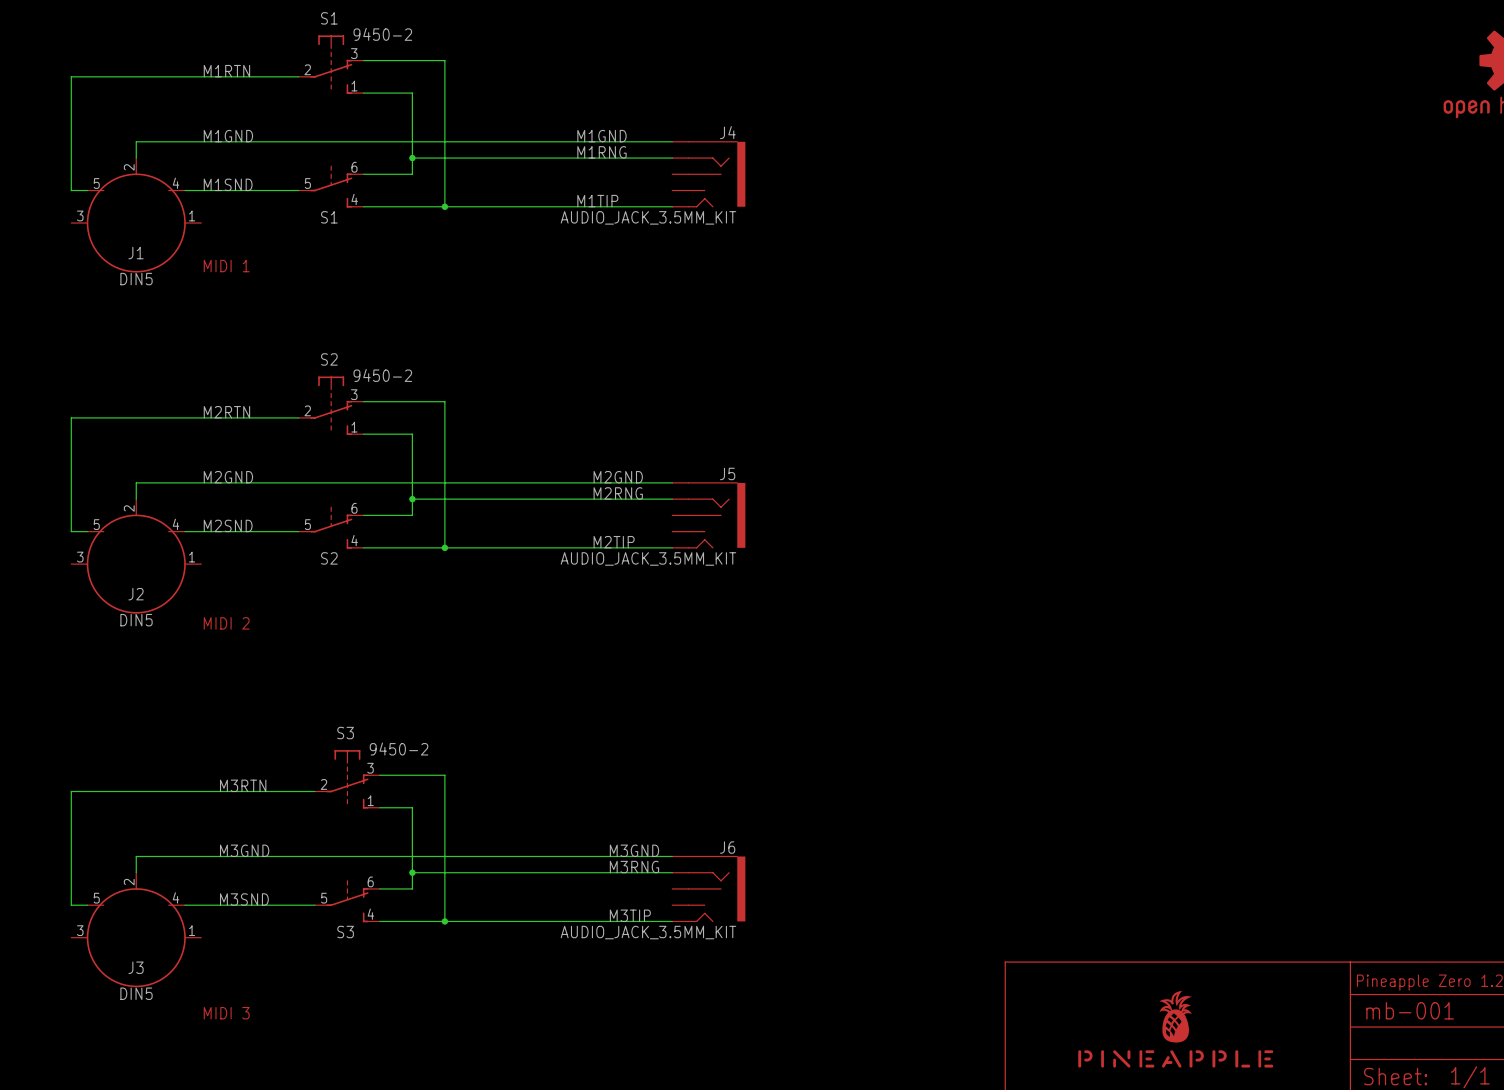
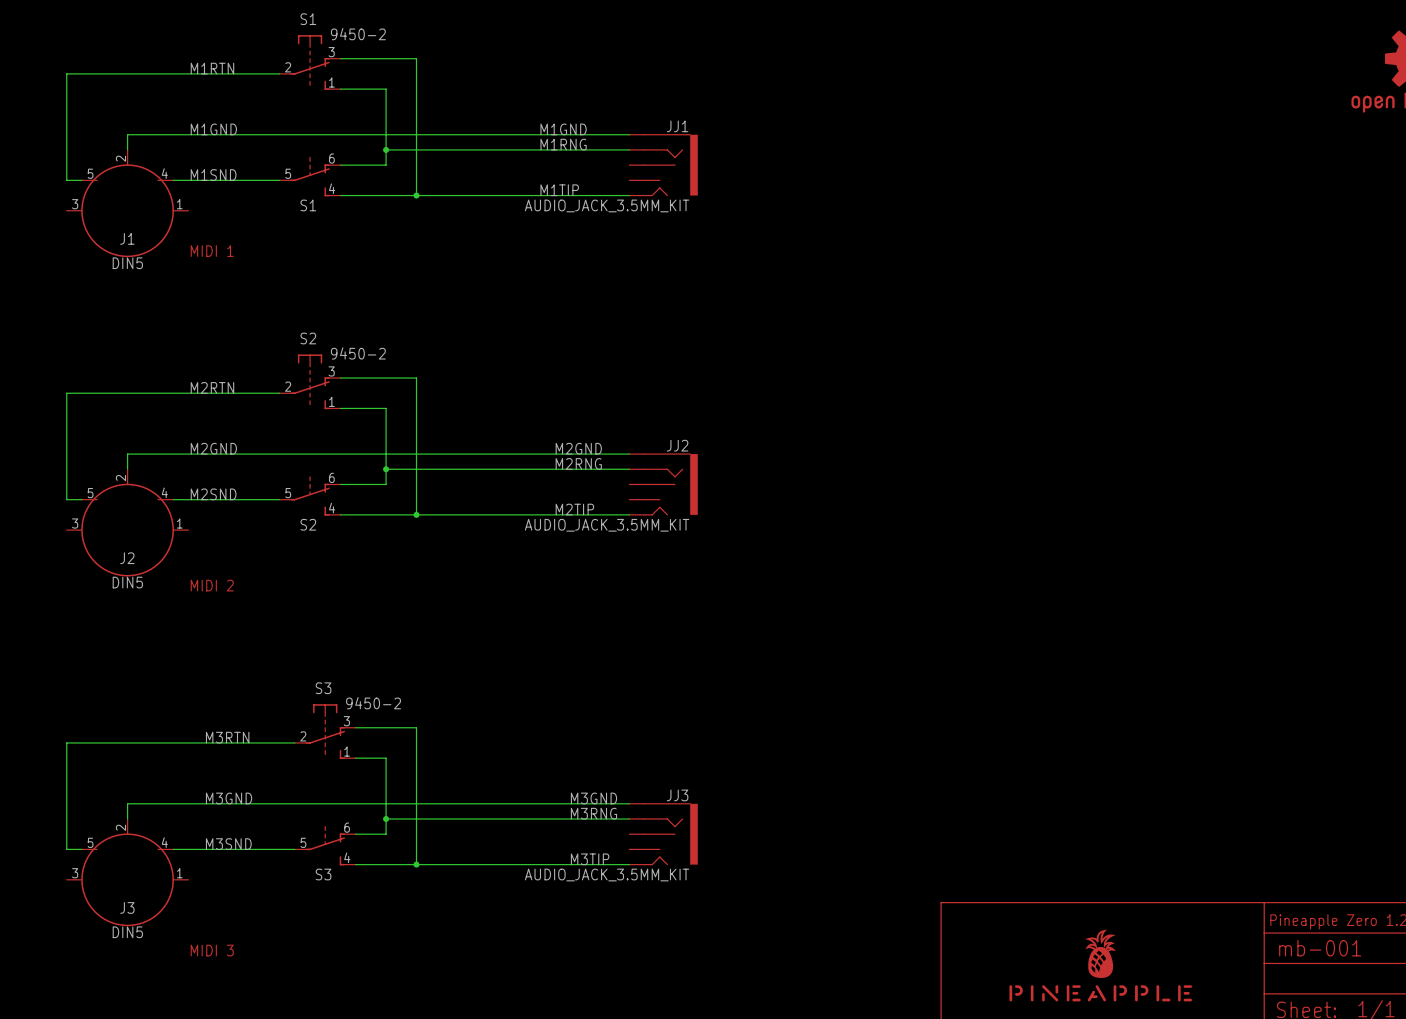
J4 name: J4 (727, 132) -> JJ1 (677, 126)
J5 name: J5 (727, 473) -> JJ2 (677, 445)
J6 name: J6 (727, 847) -> JJ3 (677, 795)

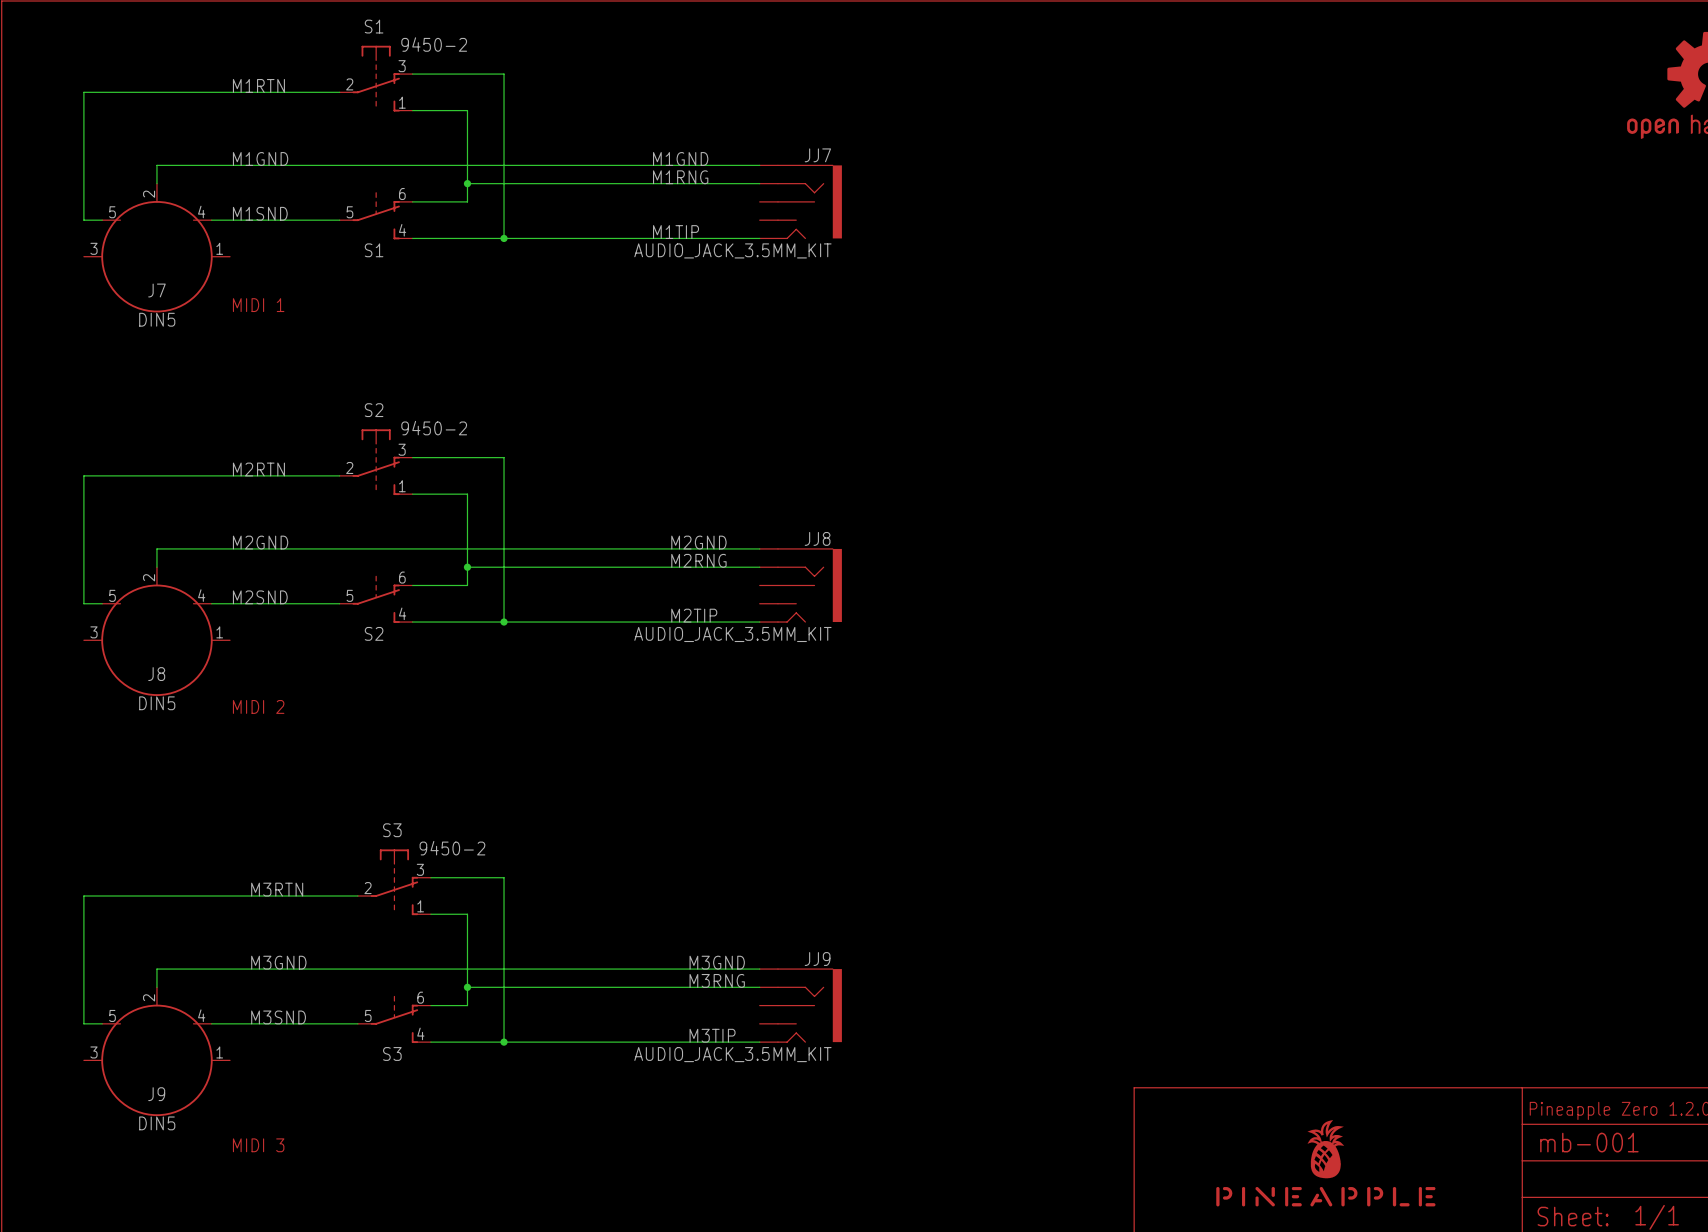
JJ1 name: JJ1 (677, 126) -> JJ7 (817, 155)
J1 name: J1 (127, 238) -> J7 (156, 290)
JJ2 name: JJ2 (677, 445) -> JJ8 (817, 538)
J2 name: J2 (127, 558) -> J8 (156, 674)
JJ3 name: JJ3 (677, 795) -> JJ9 (817, 959)
J3 name: J3 (127, 907) -> J9 (156, 1094)

